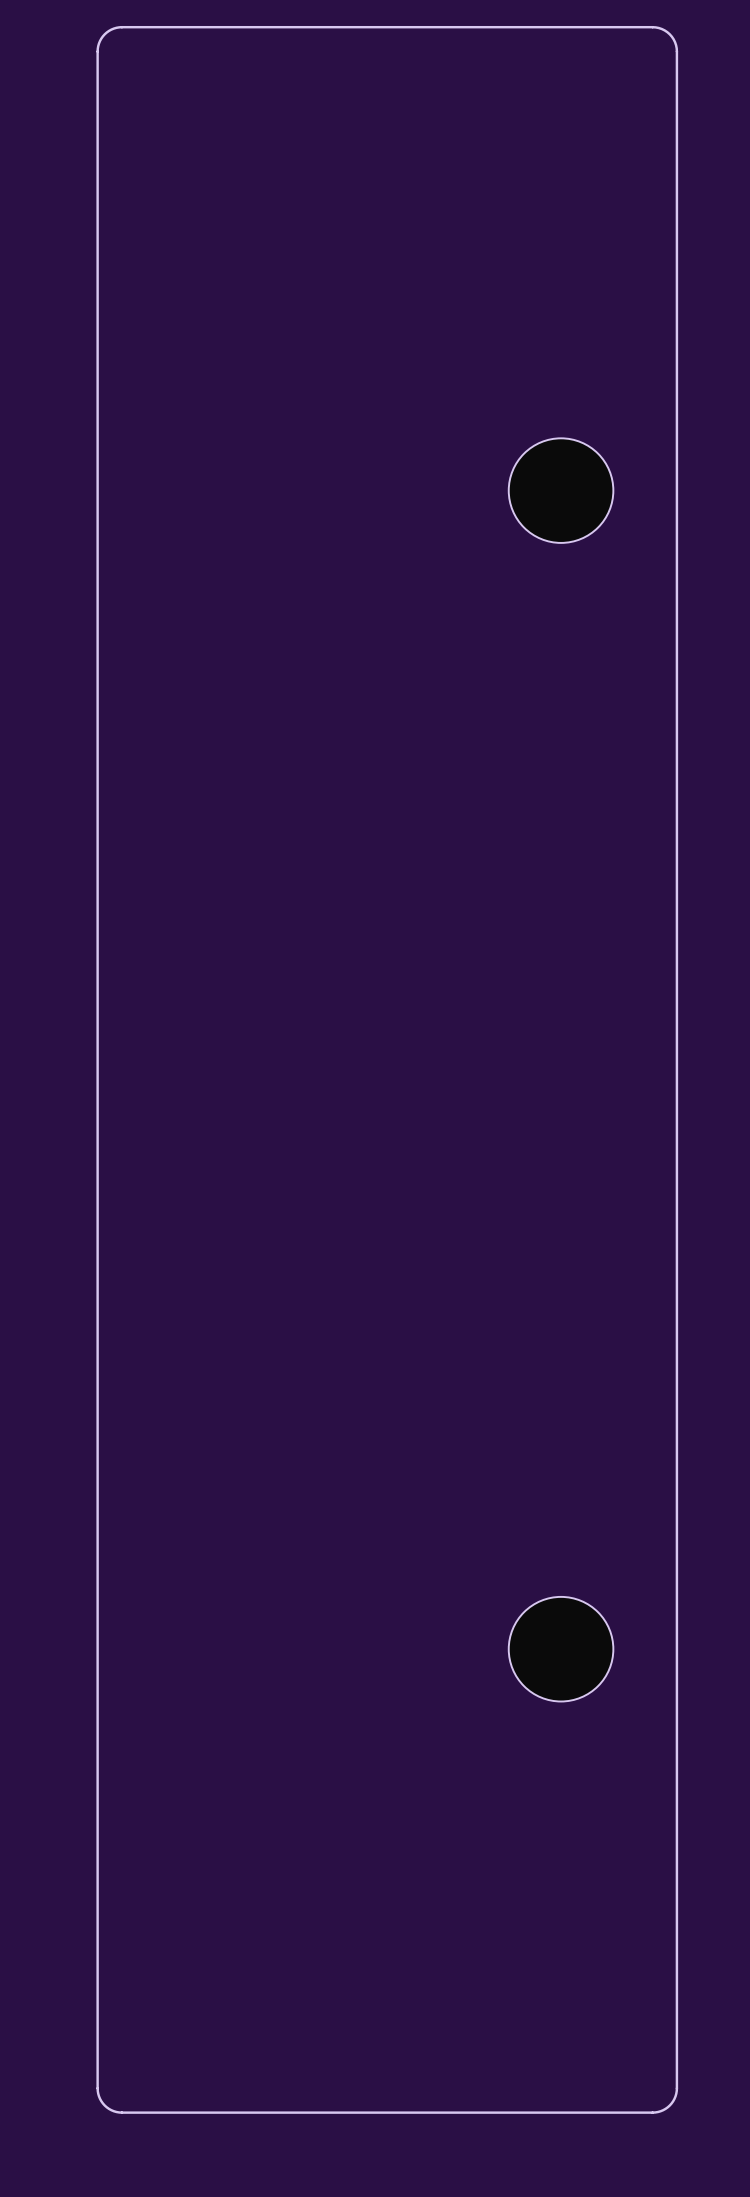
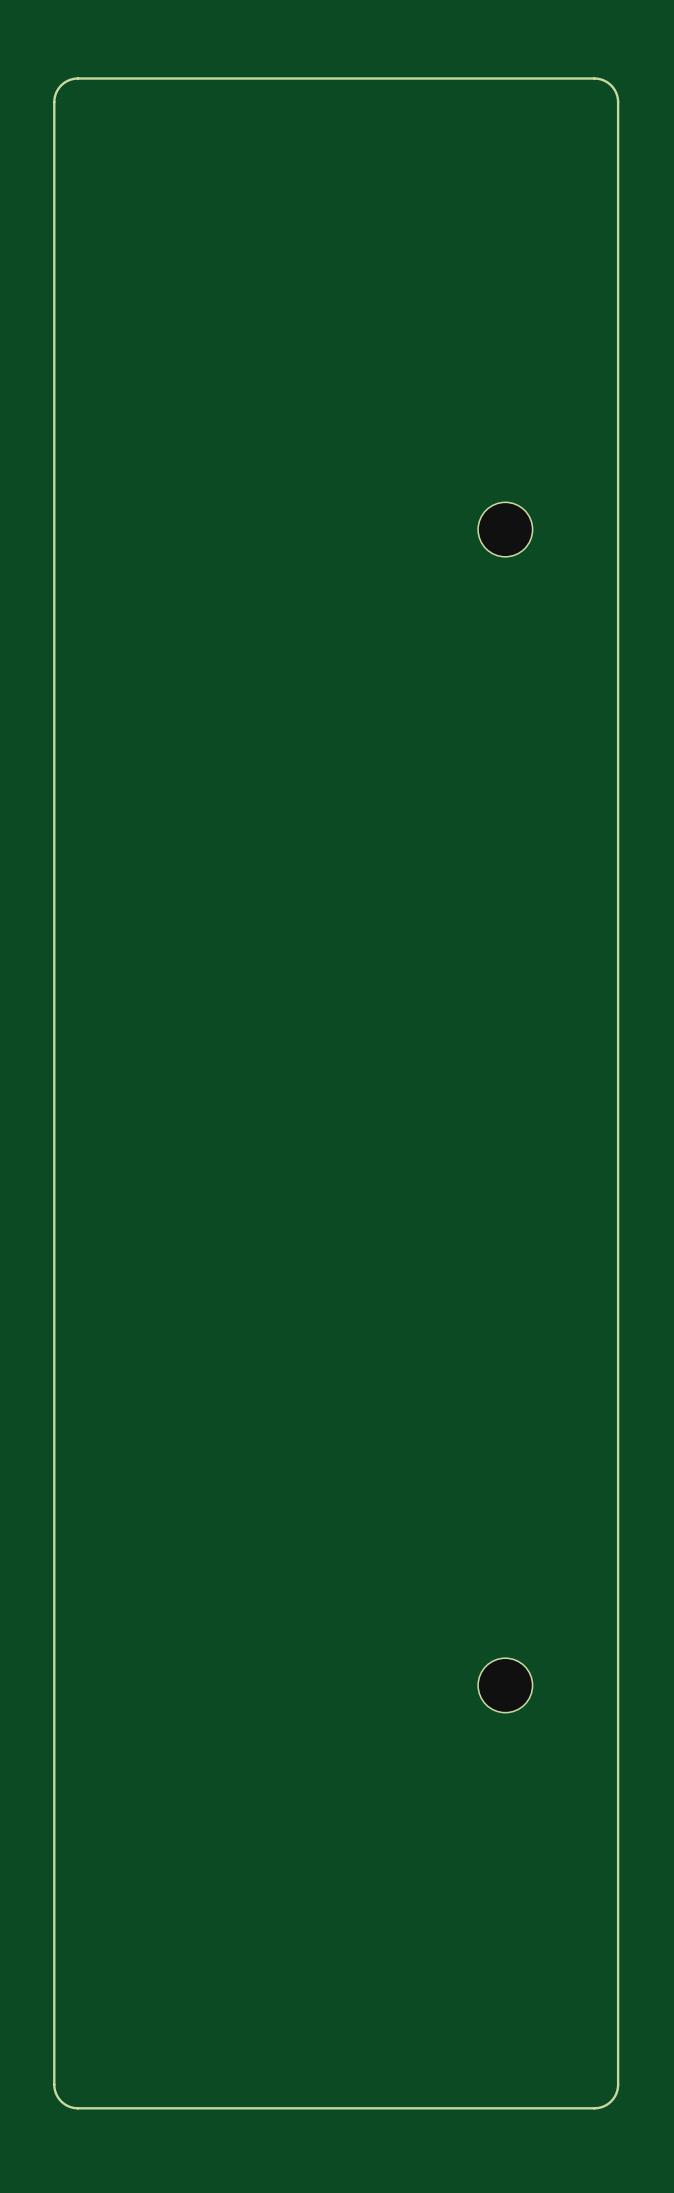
part footprint: [508, 438, 614, 543] -> [478, 502, 533, 557]
part: (561, 1649) -> none
part: none -> (505, 1685)

